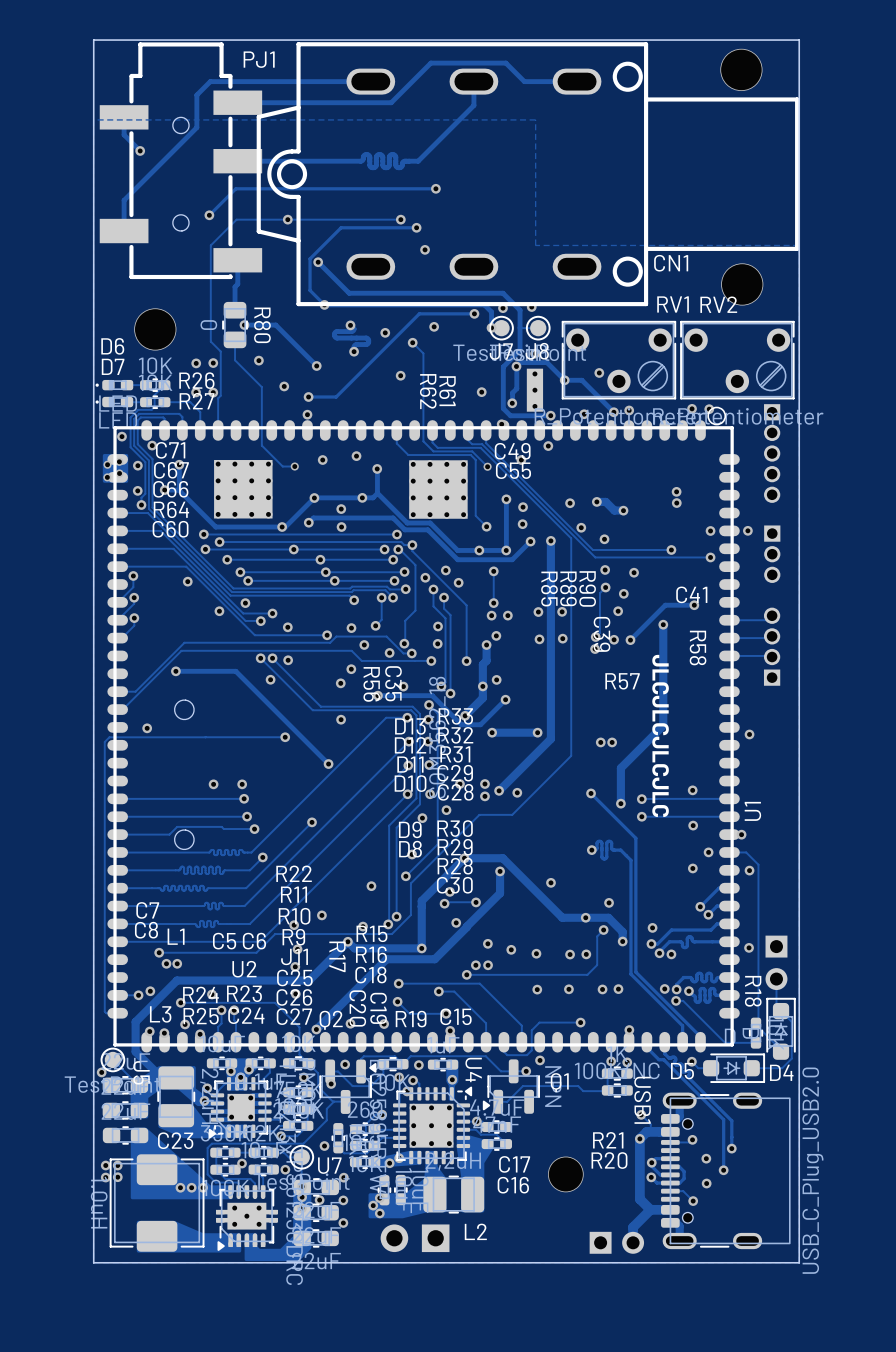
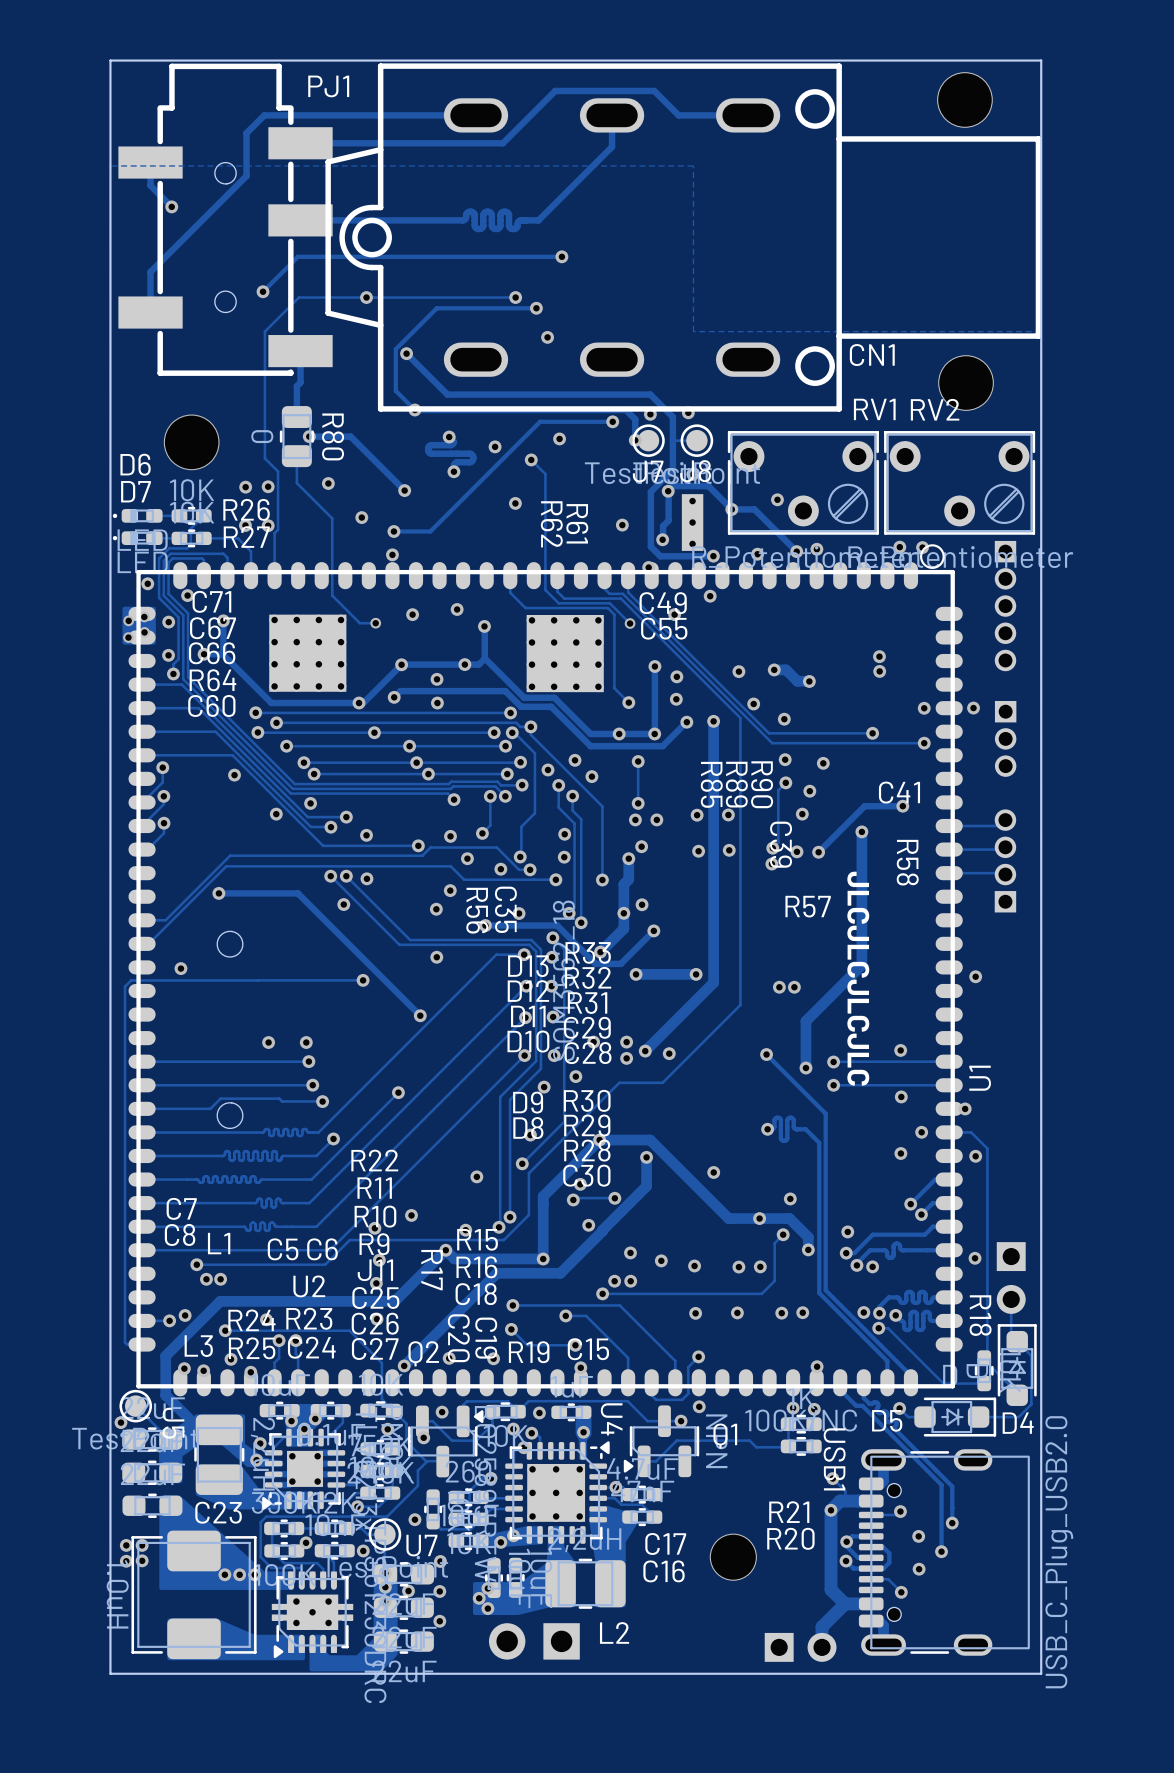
track: (580, 1022) (539, 1022) -> none
via position: (580, 1022) -> (698, 1356)

